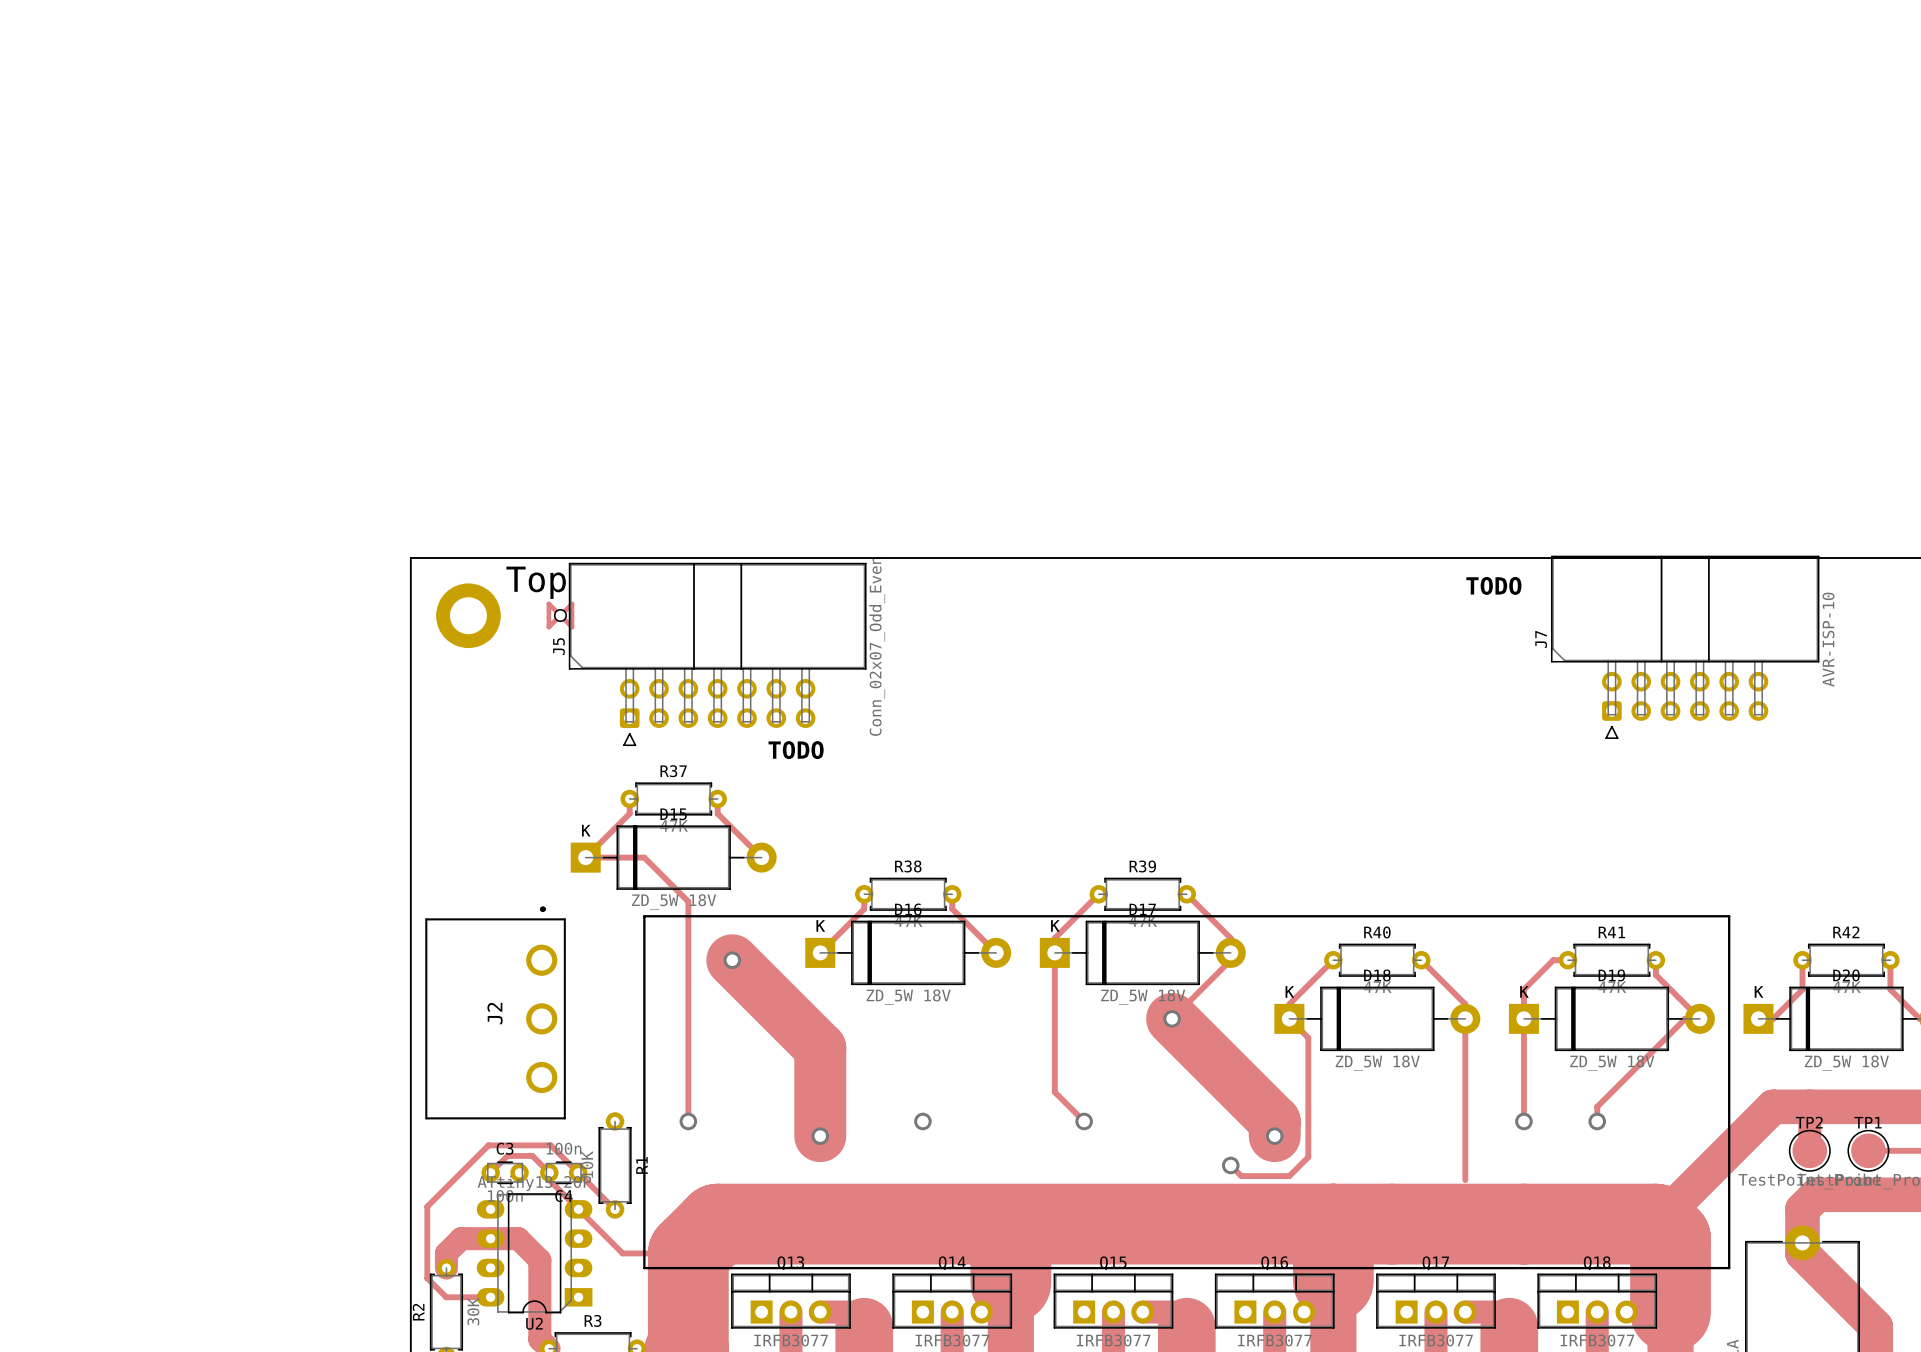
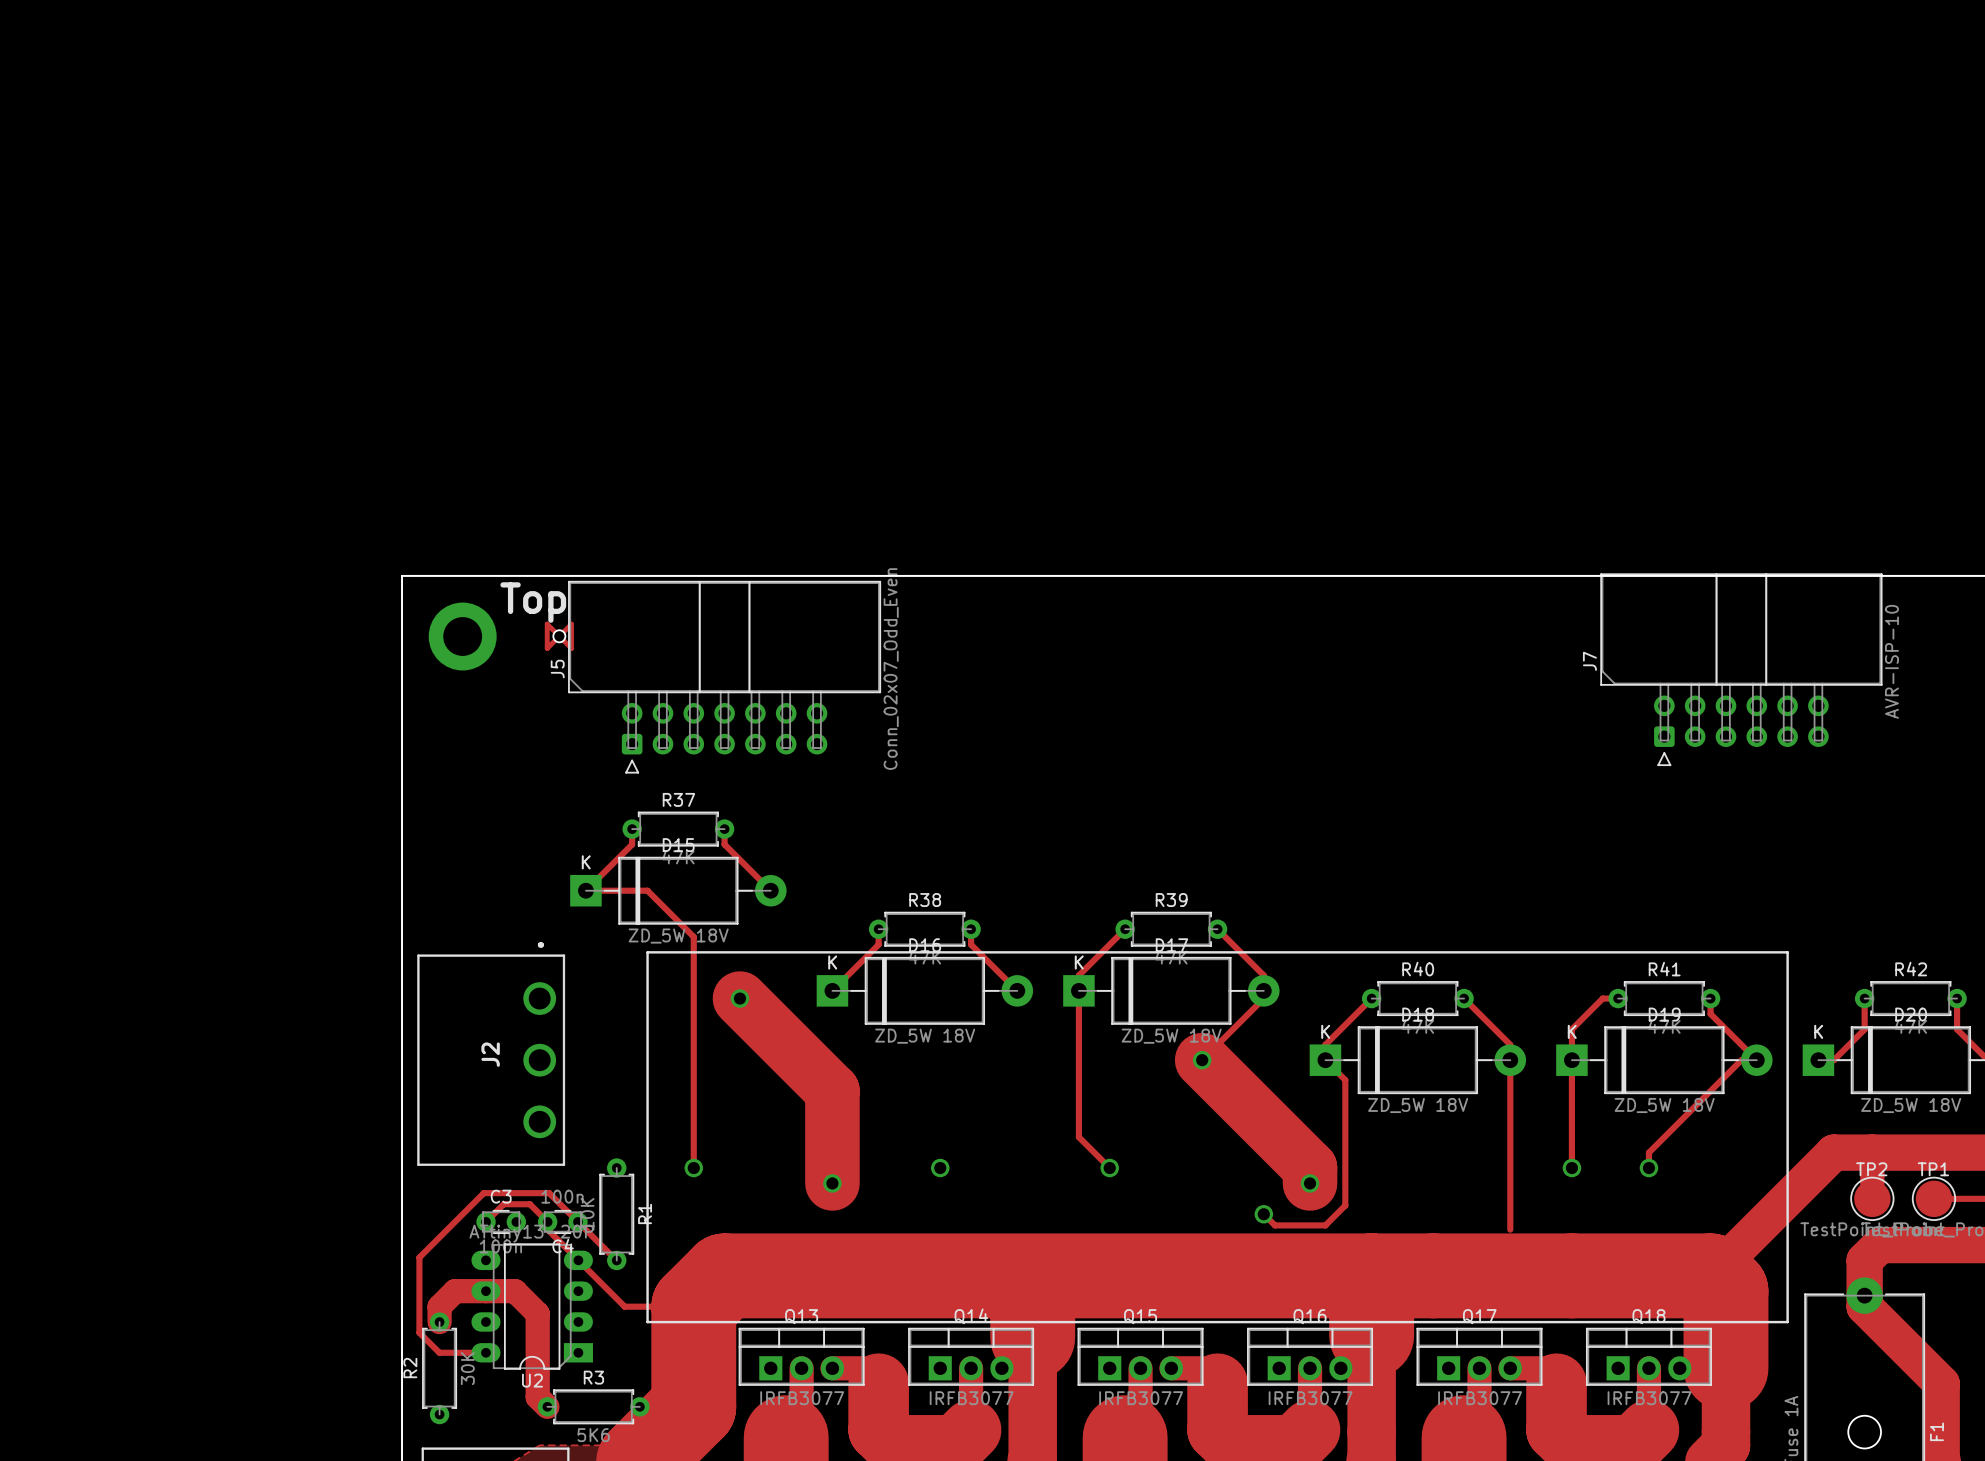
text: TODO (1493, 585) -> none
text: TODO (796, 750) -> none

